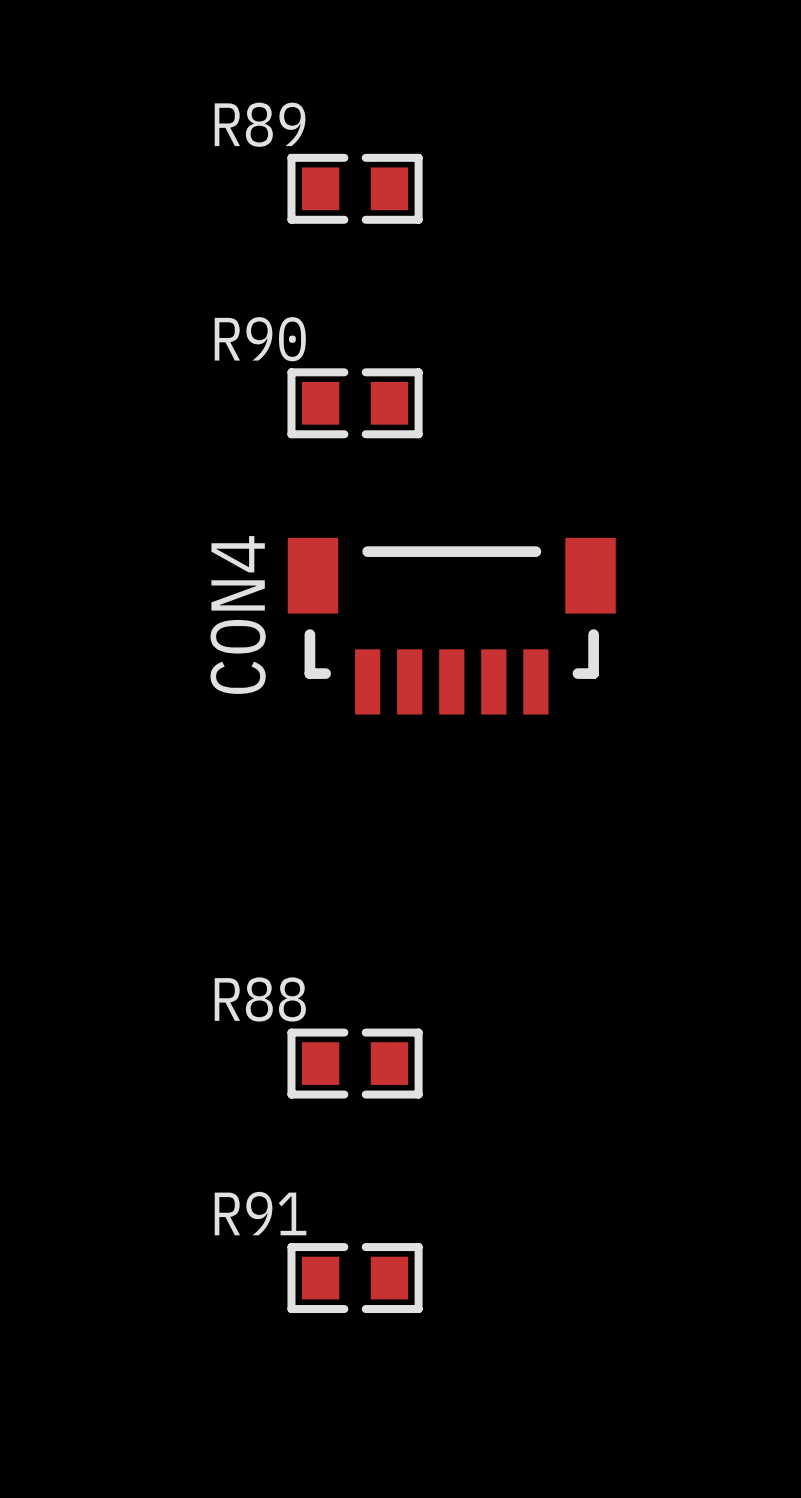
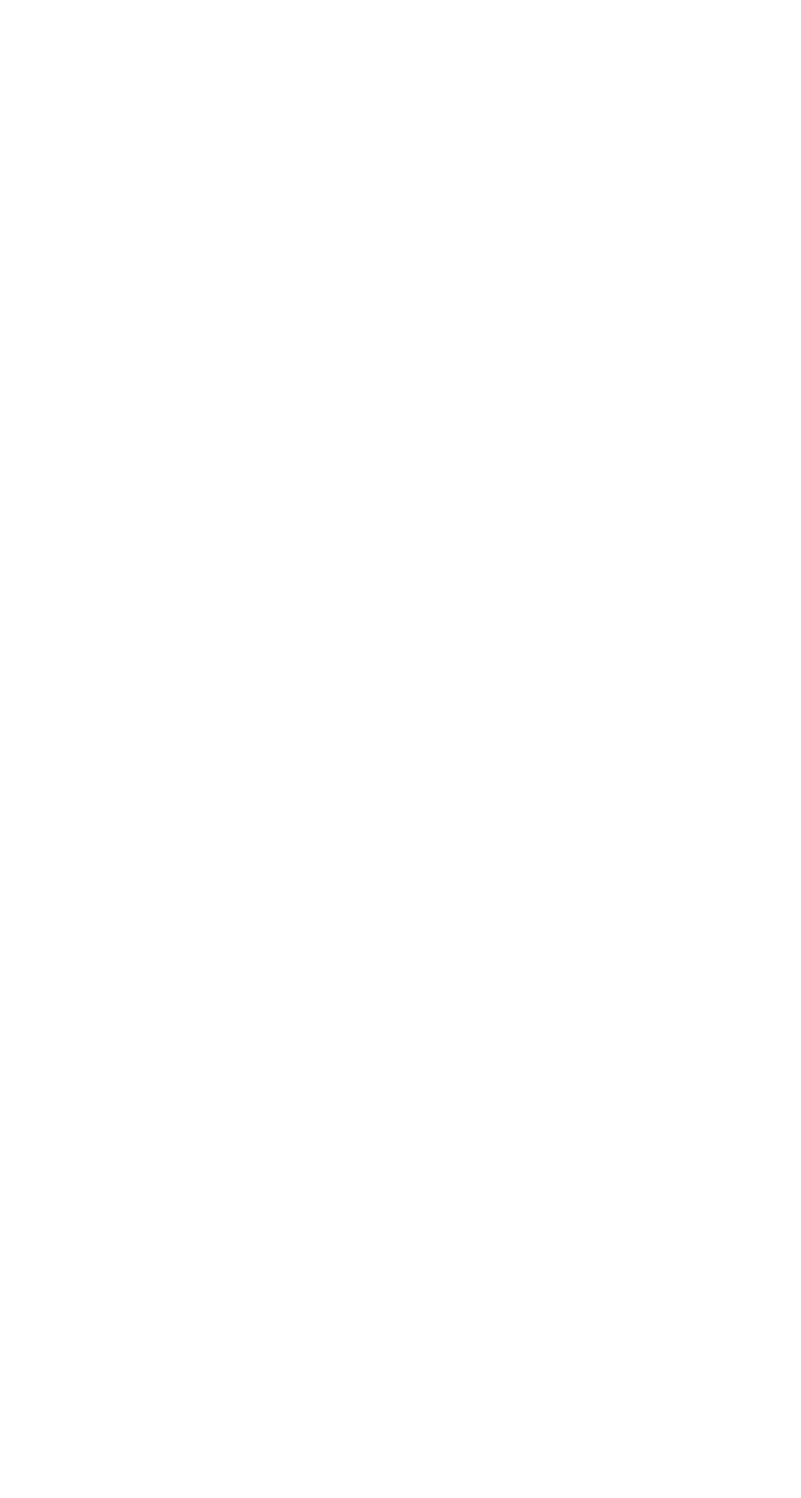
R89: (355, 188) -> none
R90: (355, 403) -> none
CON4: (451, 626) -> none
R88: (355, 1063) -> none
R91: (355, 1278) -> none

